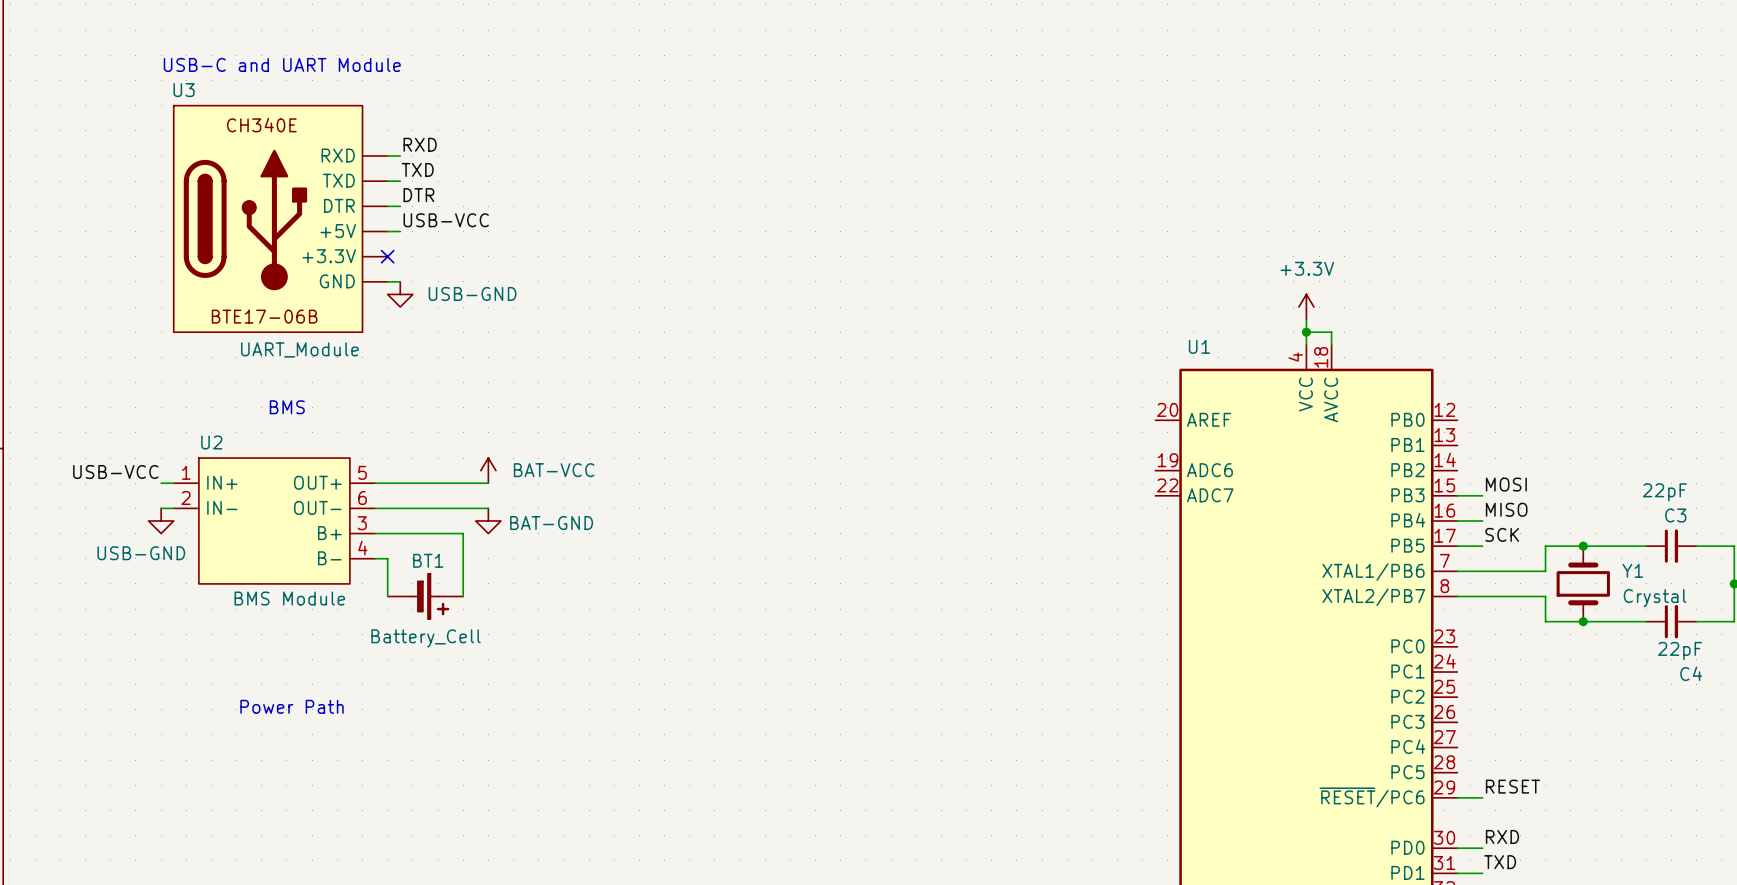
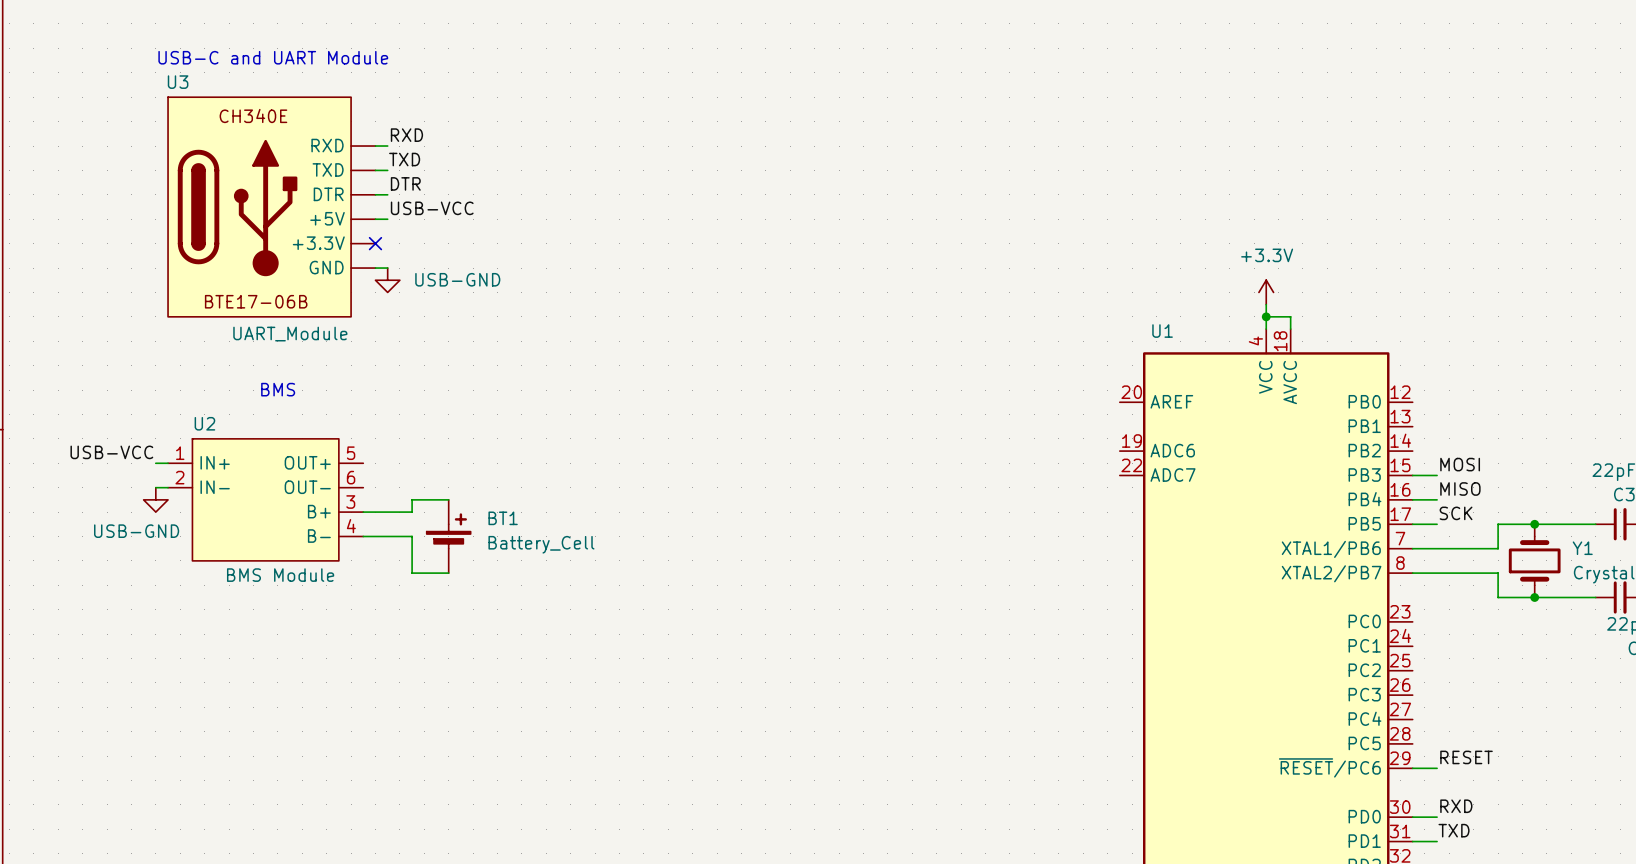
power symbol: BAT-VCC (488, 470) -> none
wire: (375, 483) (488, 483) -> none
wire: (375, 508) (488, 508) -> none
wire: none -> (448, 499) (412, 499) (412, 512)
power symbol: BAT-GND (488, 520) -> none
wire: (425, 533) (463, 533) (463, 596) -> (375, 536) (412, 536) (412, 573) (448, 573)
wire: (387, 558) (387, 596) -> none
BT1 name position: BT1 (428, 560) -> BT1 (503, 518)
BT1 position: (425, 596) -> (448, 536)
BT1 rotation: 0° (431, 596) -> 90° counterclockwise (448, 530)
BT1 value position: Battery_Cell (426, 638) -> Battery_Cell (541, 544)
text: Power Path (292, 706) -> none

